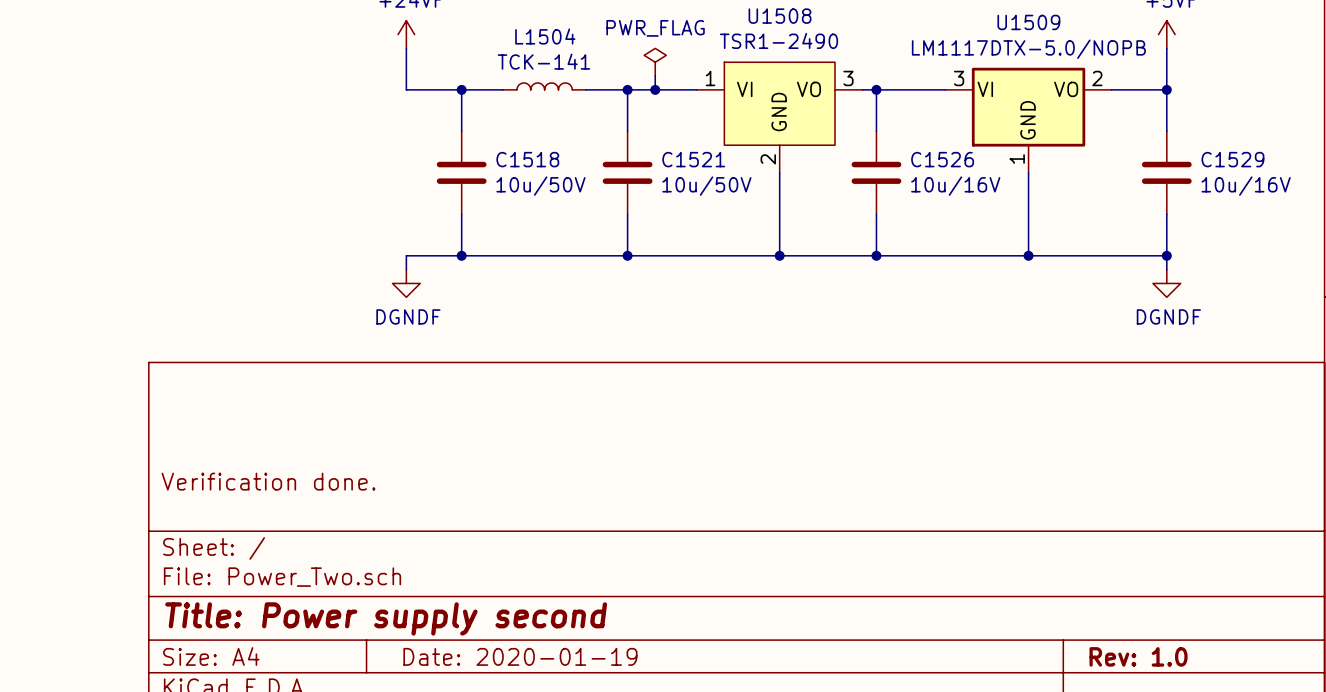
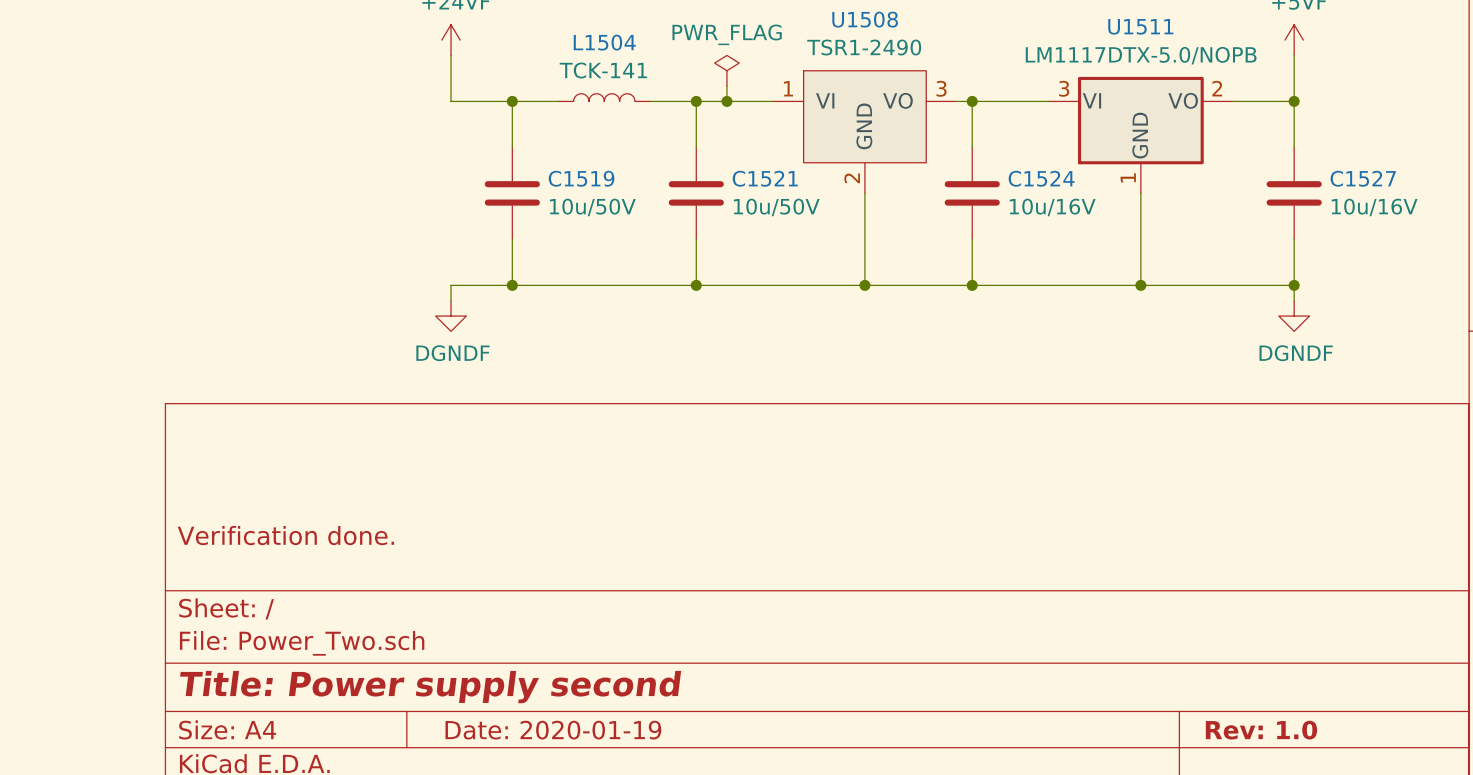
U1509 name: U1509 (1028, 22) -> U1511 (1140, 26)
C1518 name: C1518 (527, 159) -> C1519 (581, 178)
C1526 name: C1526 (942, 159) -> C1524 (1041, 178)
C1529 name: C1529 (1232, 159) -> C1527 (1363, 178)

